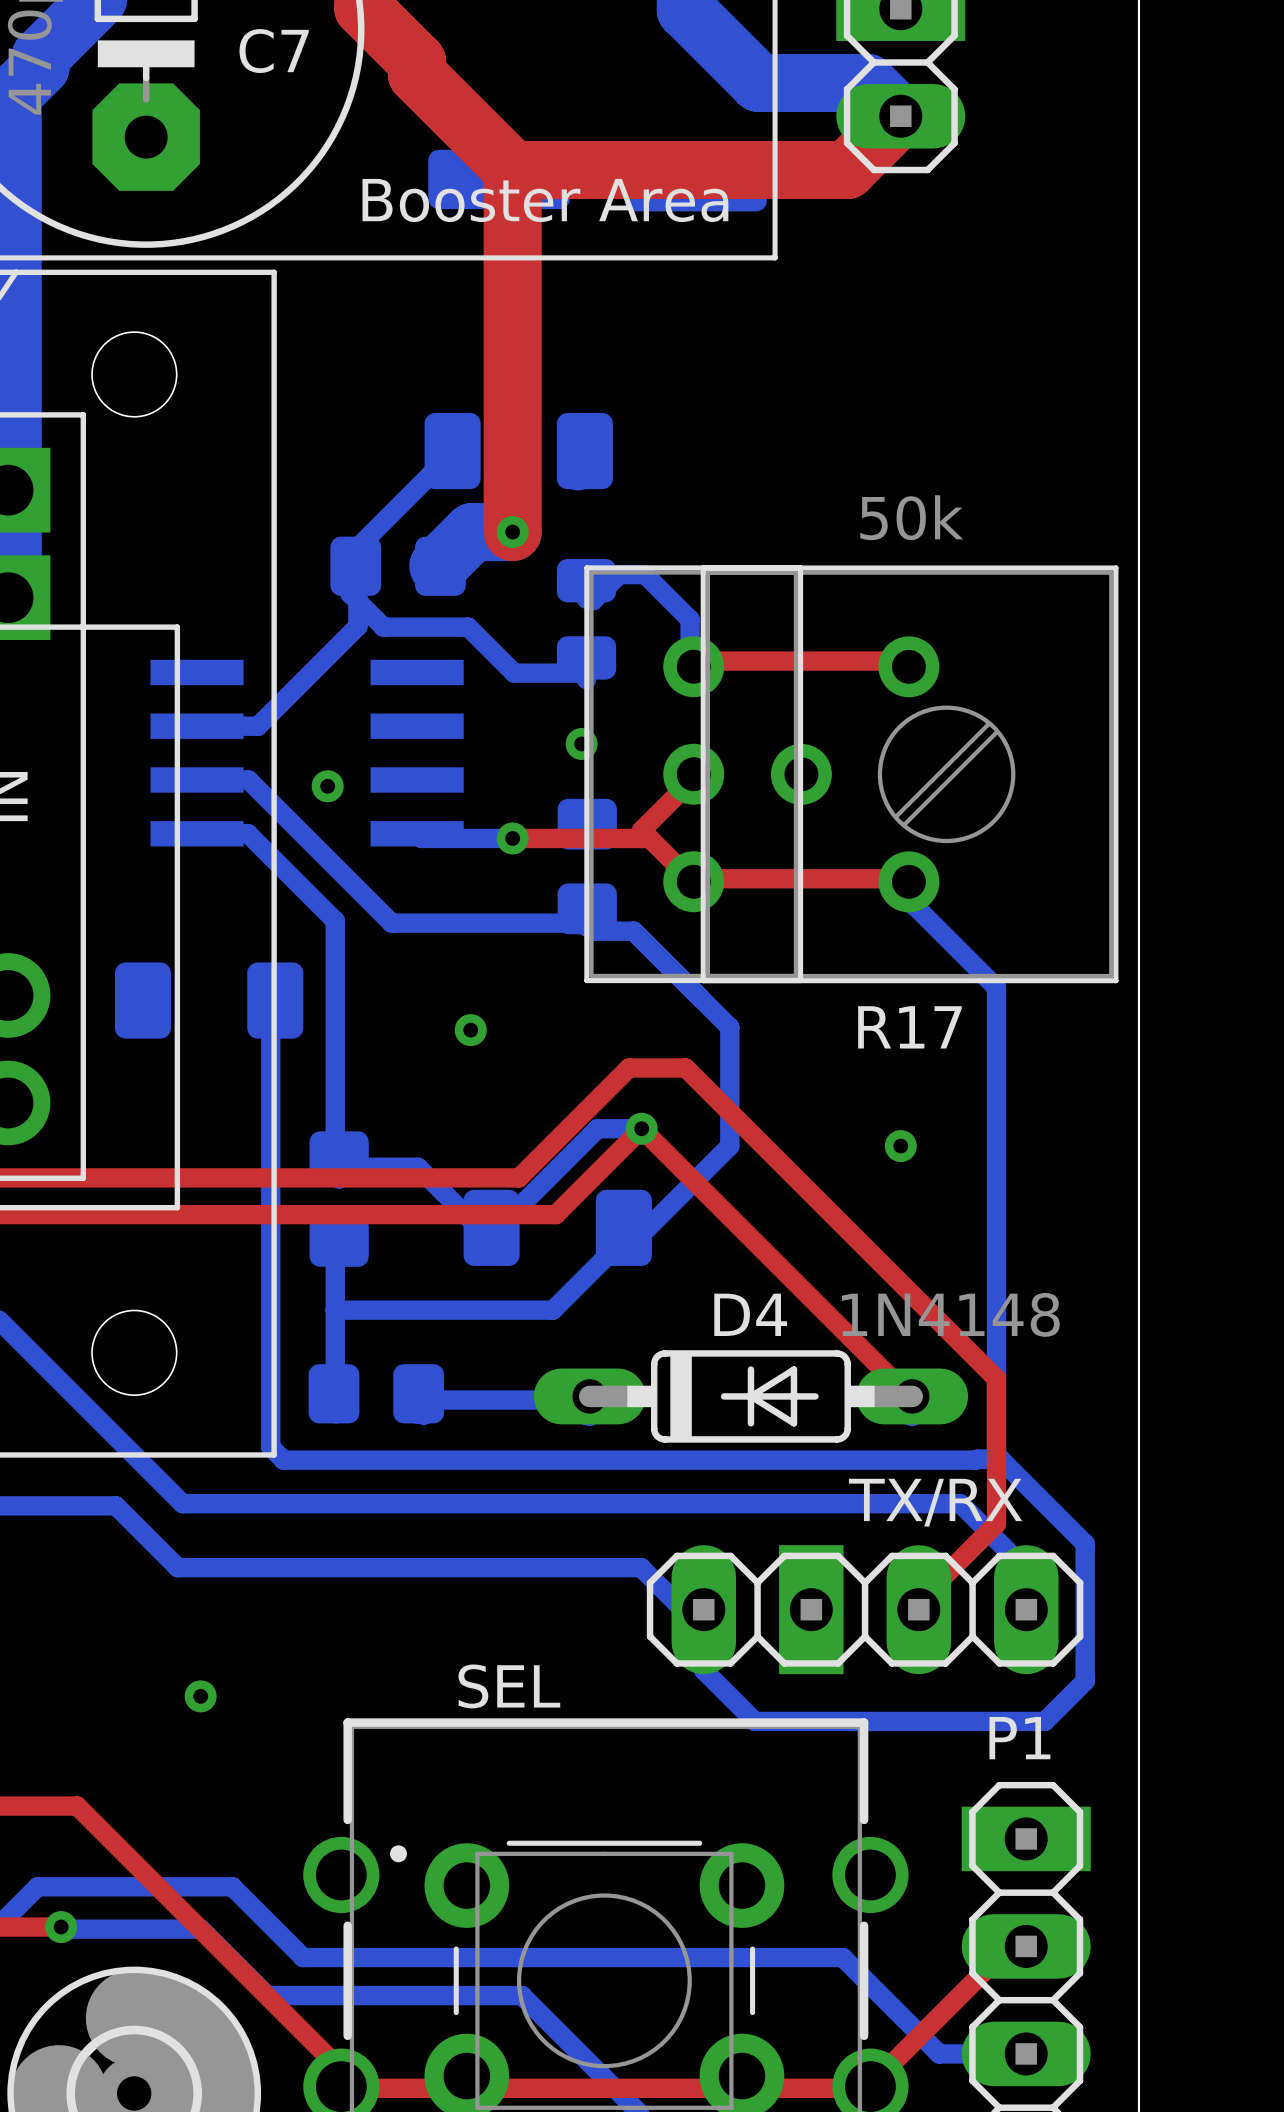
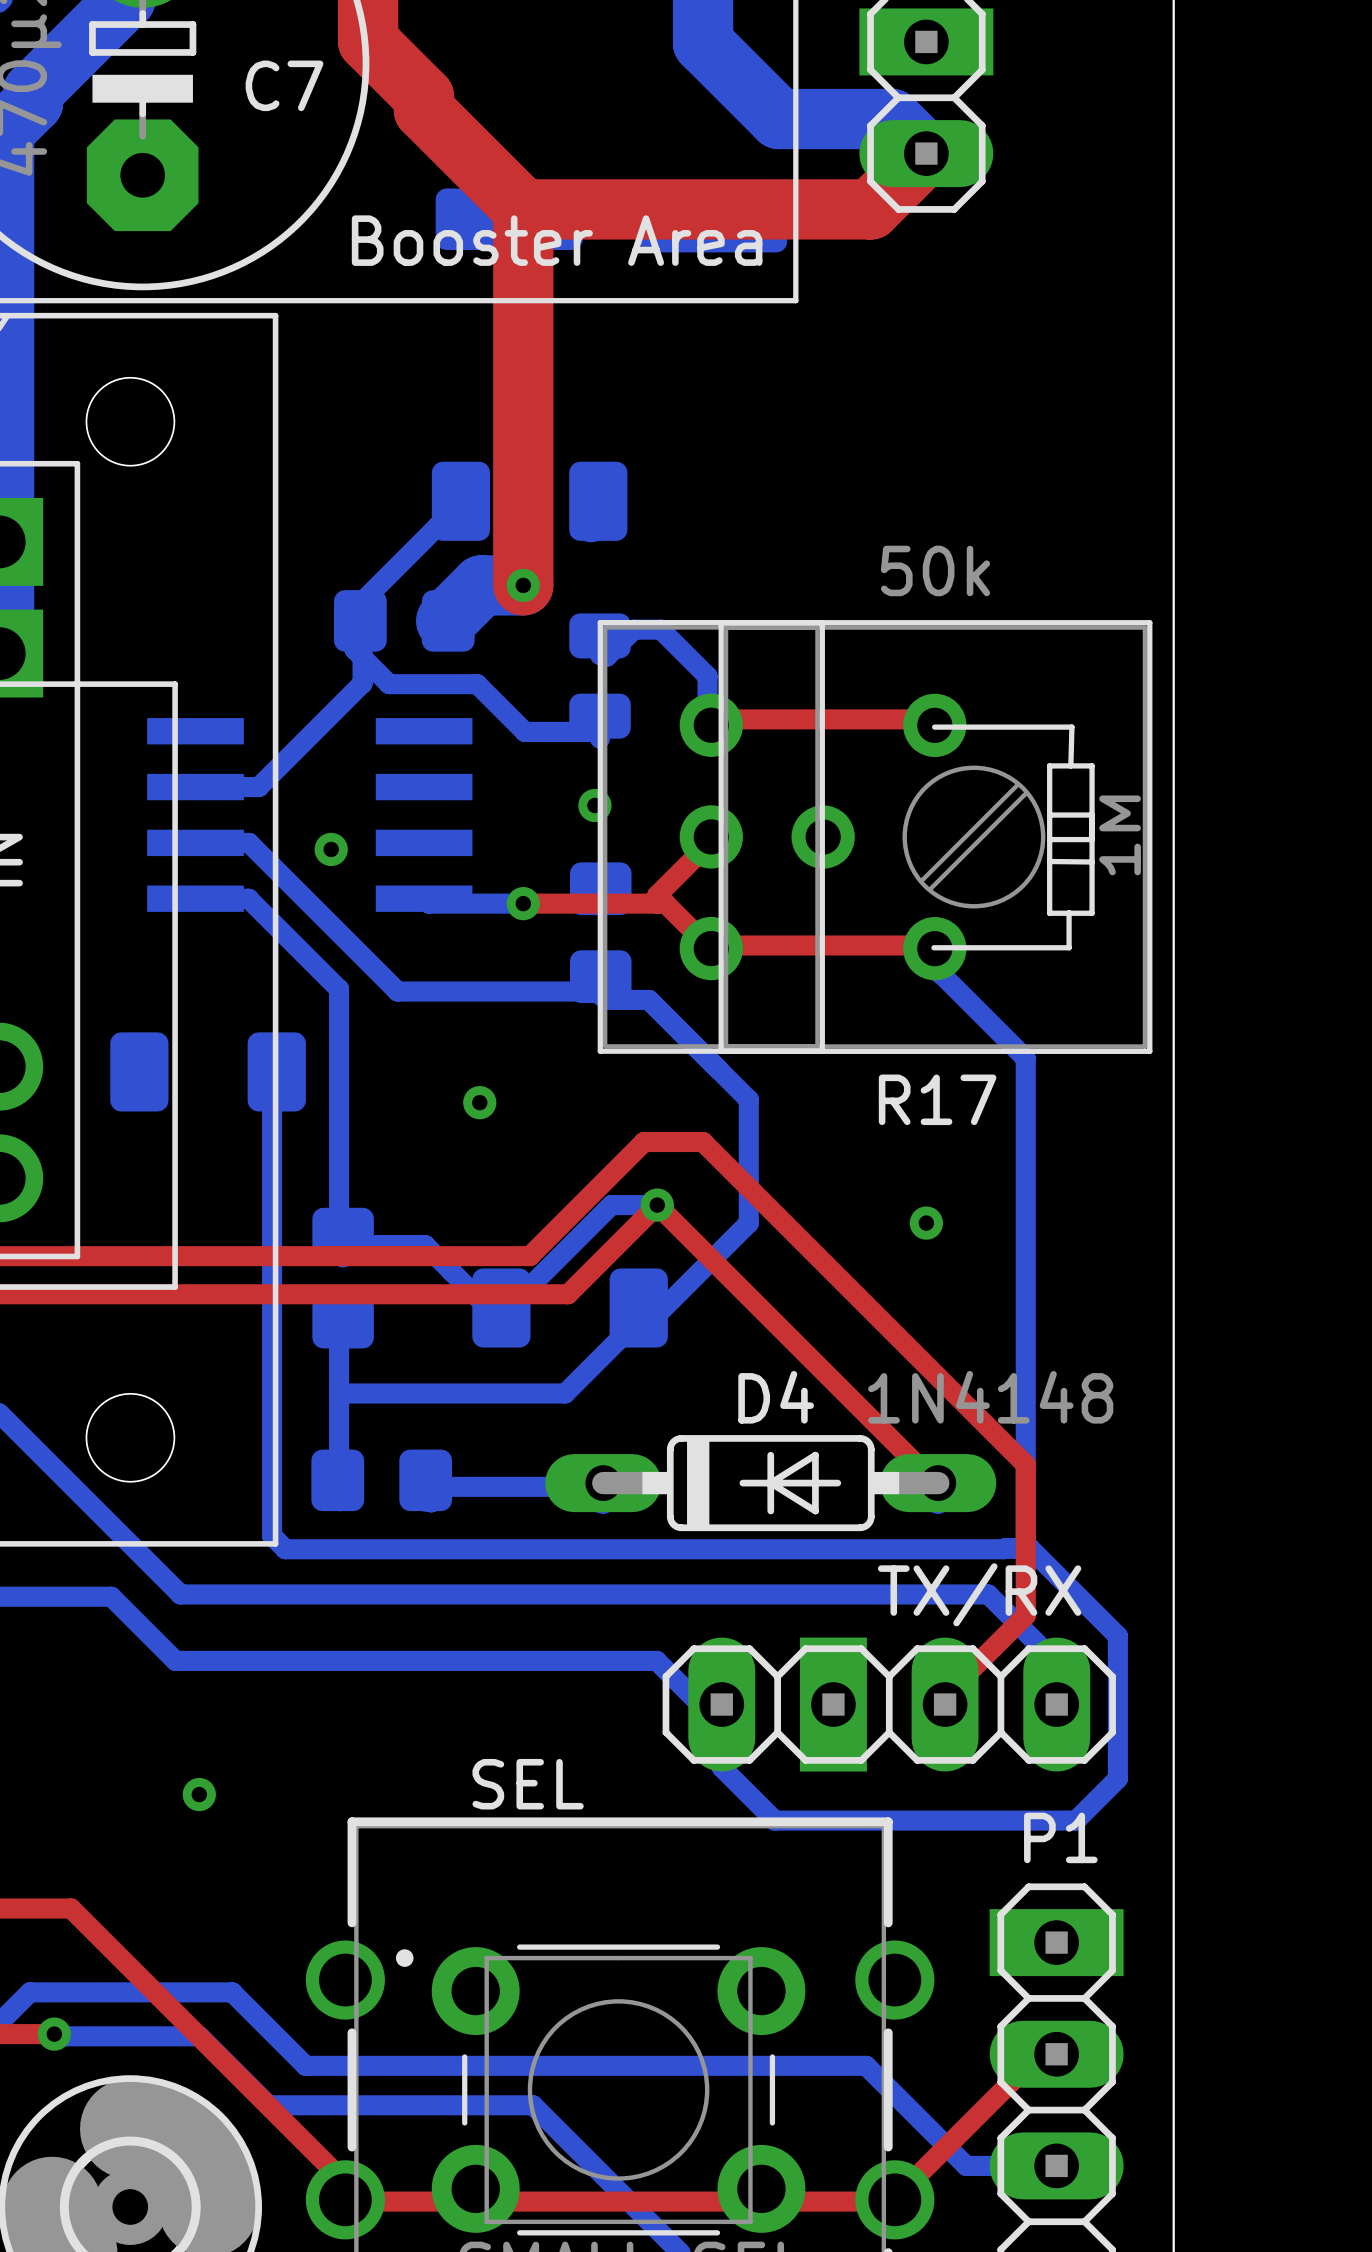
line: none -> (934, 727) (1071, 727) (1070, 765)
line: none -> (1049, 765) (1092, 765) (1092, 913) (1049, 913) (1049, 765)
line: none -> (1049, 815) (1092, 815)
line: none -> (1049, 839) (1092, 839)
text: none -> 1M (1120, 835)
line: none -> (1049, 861) (1092, 861)
line: none -> (1069, 912) (1069, 947) (933, 947)

